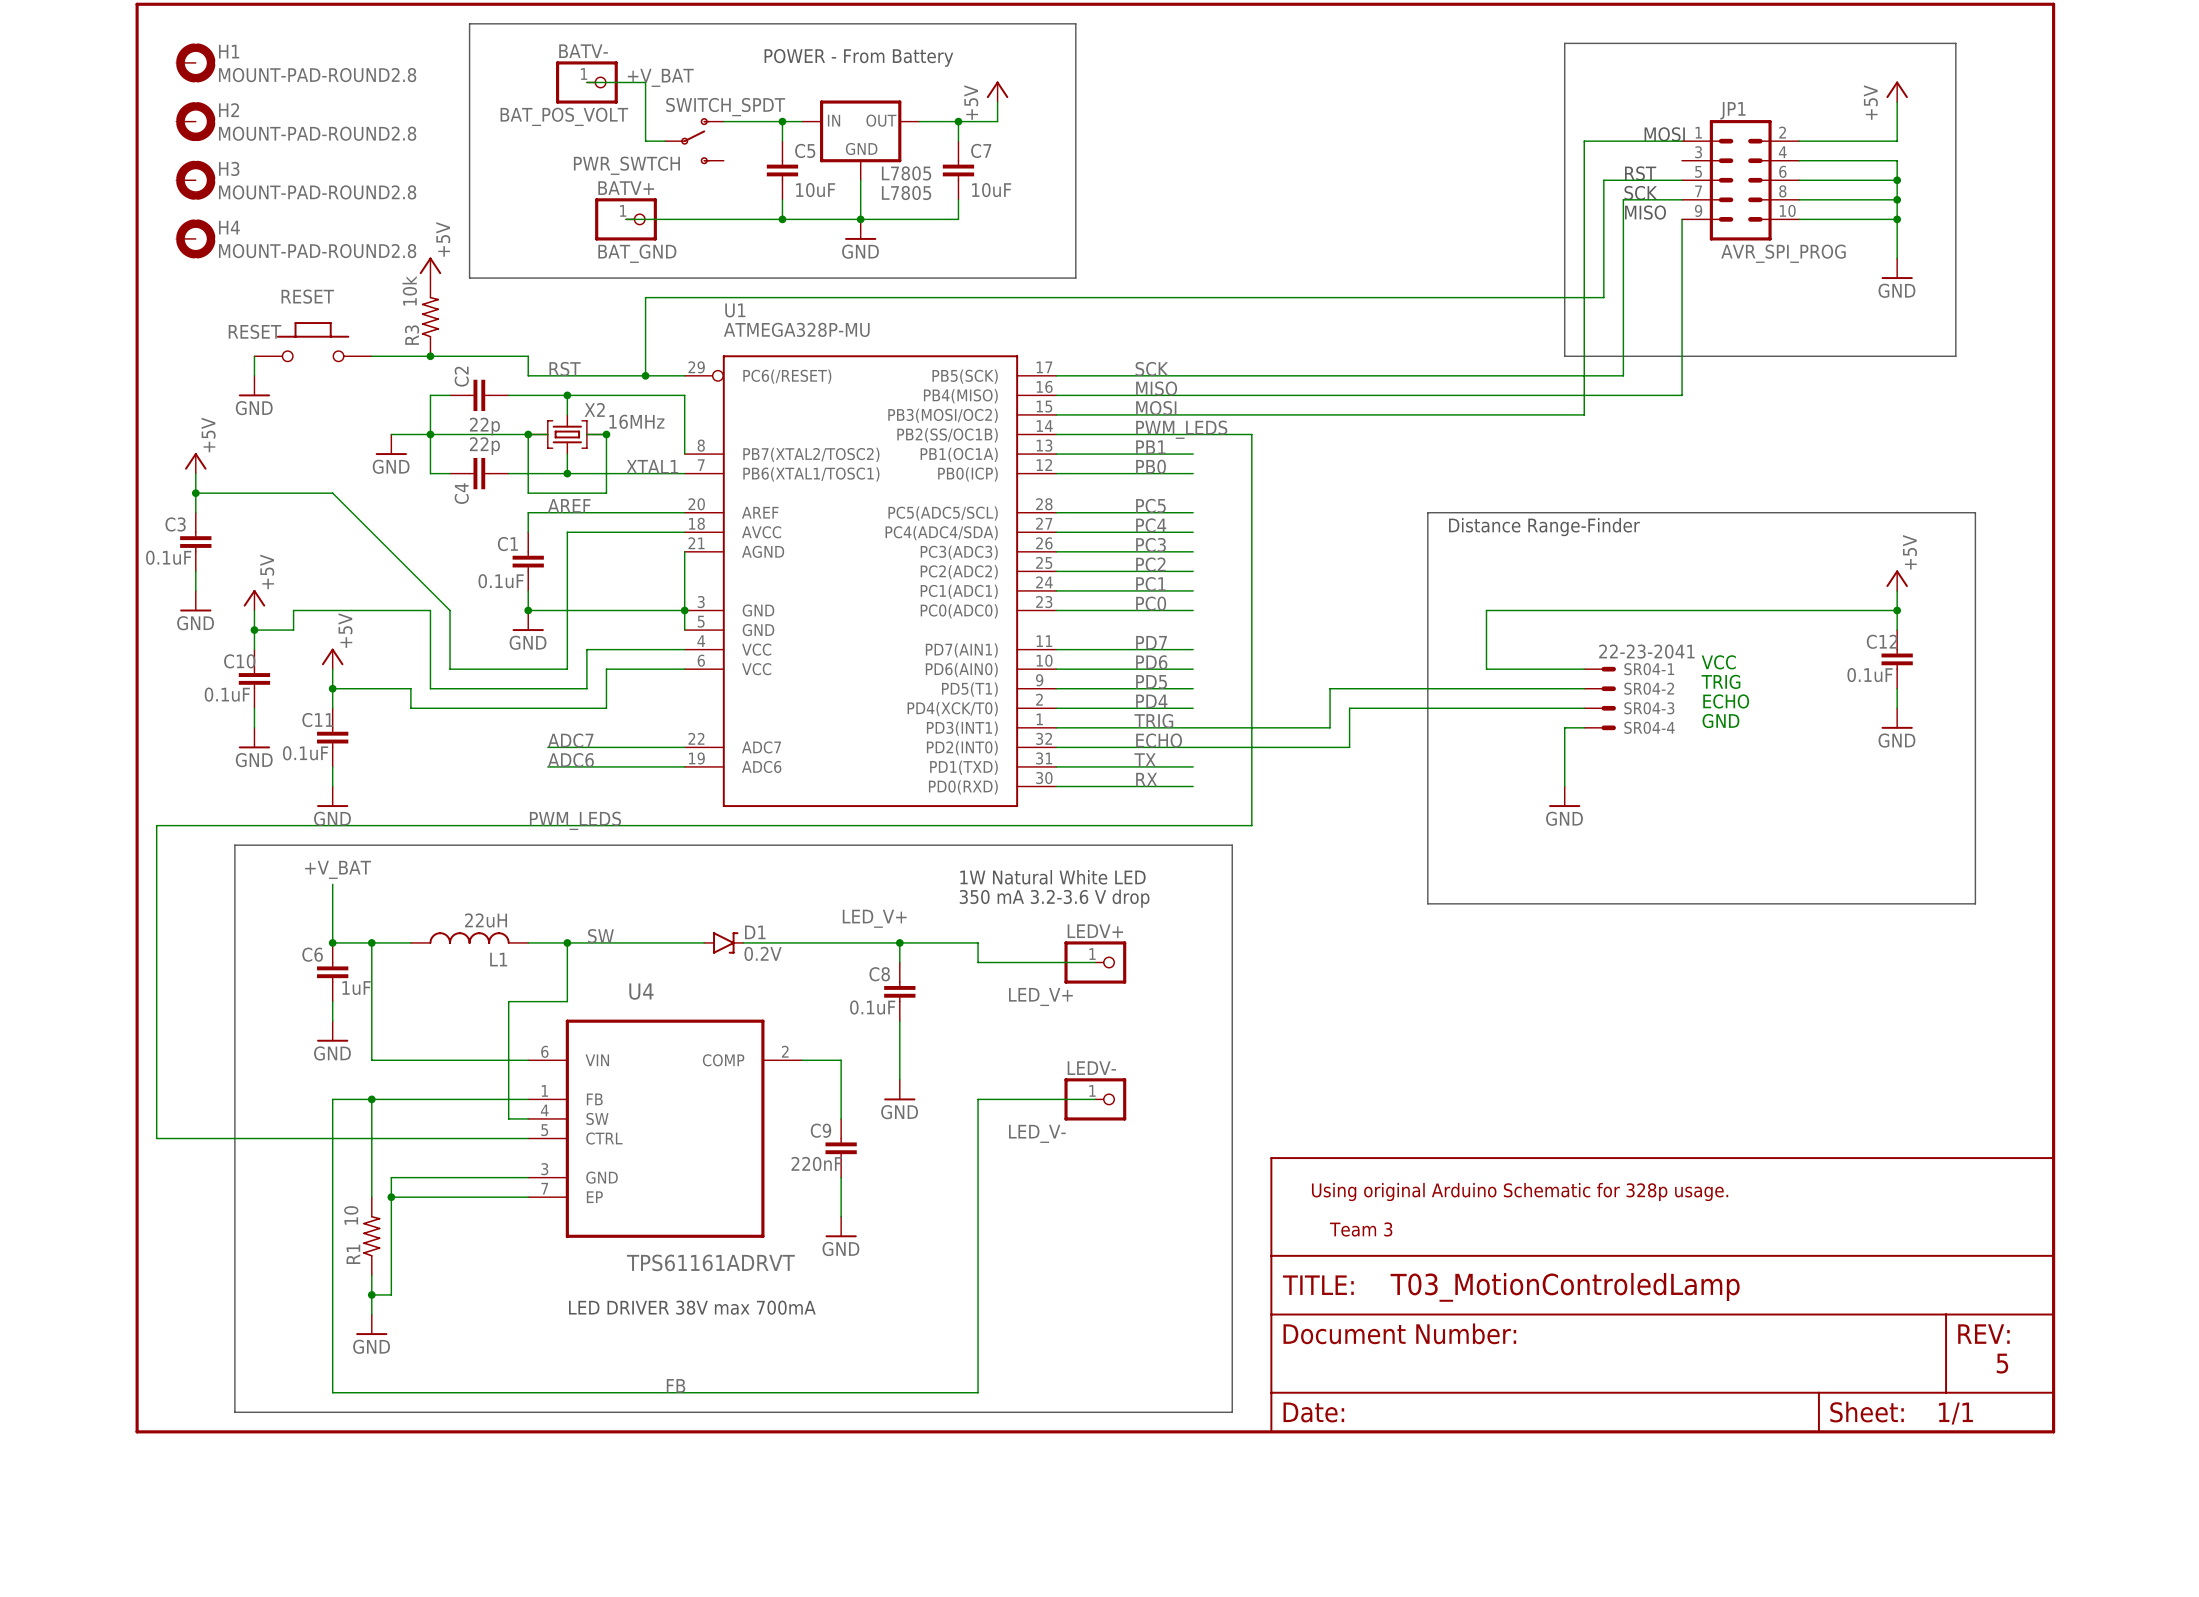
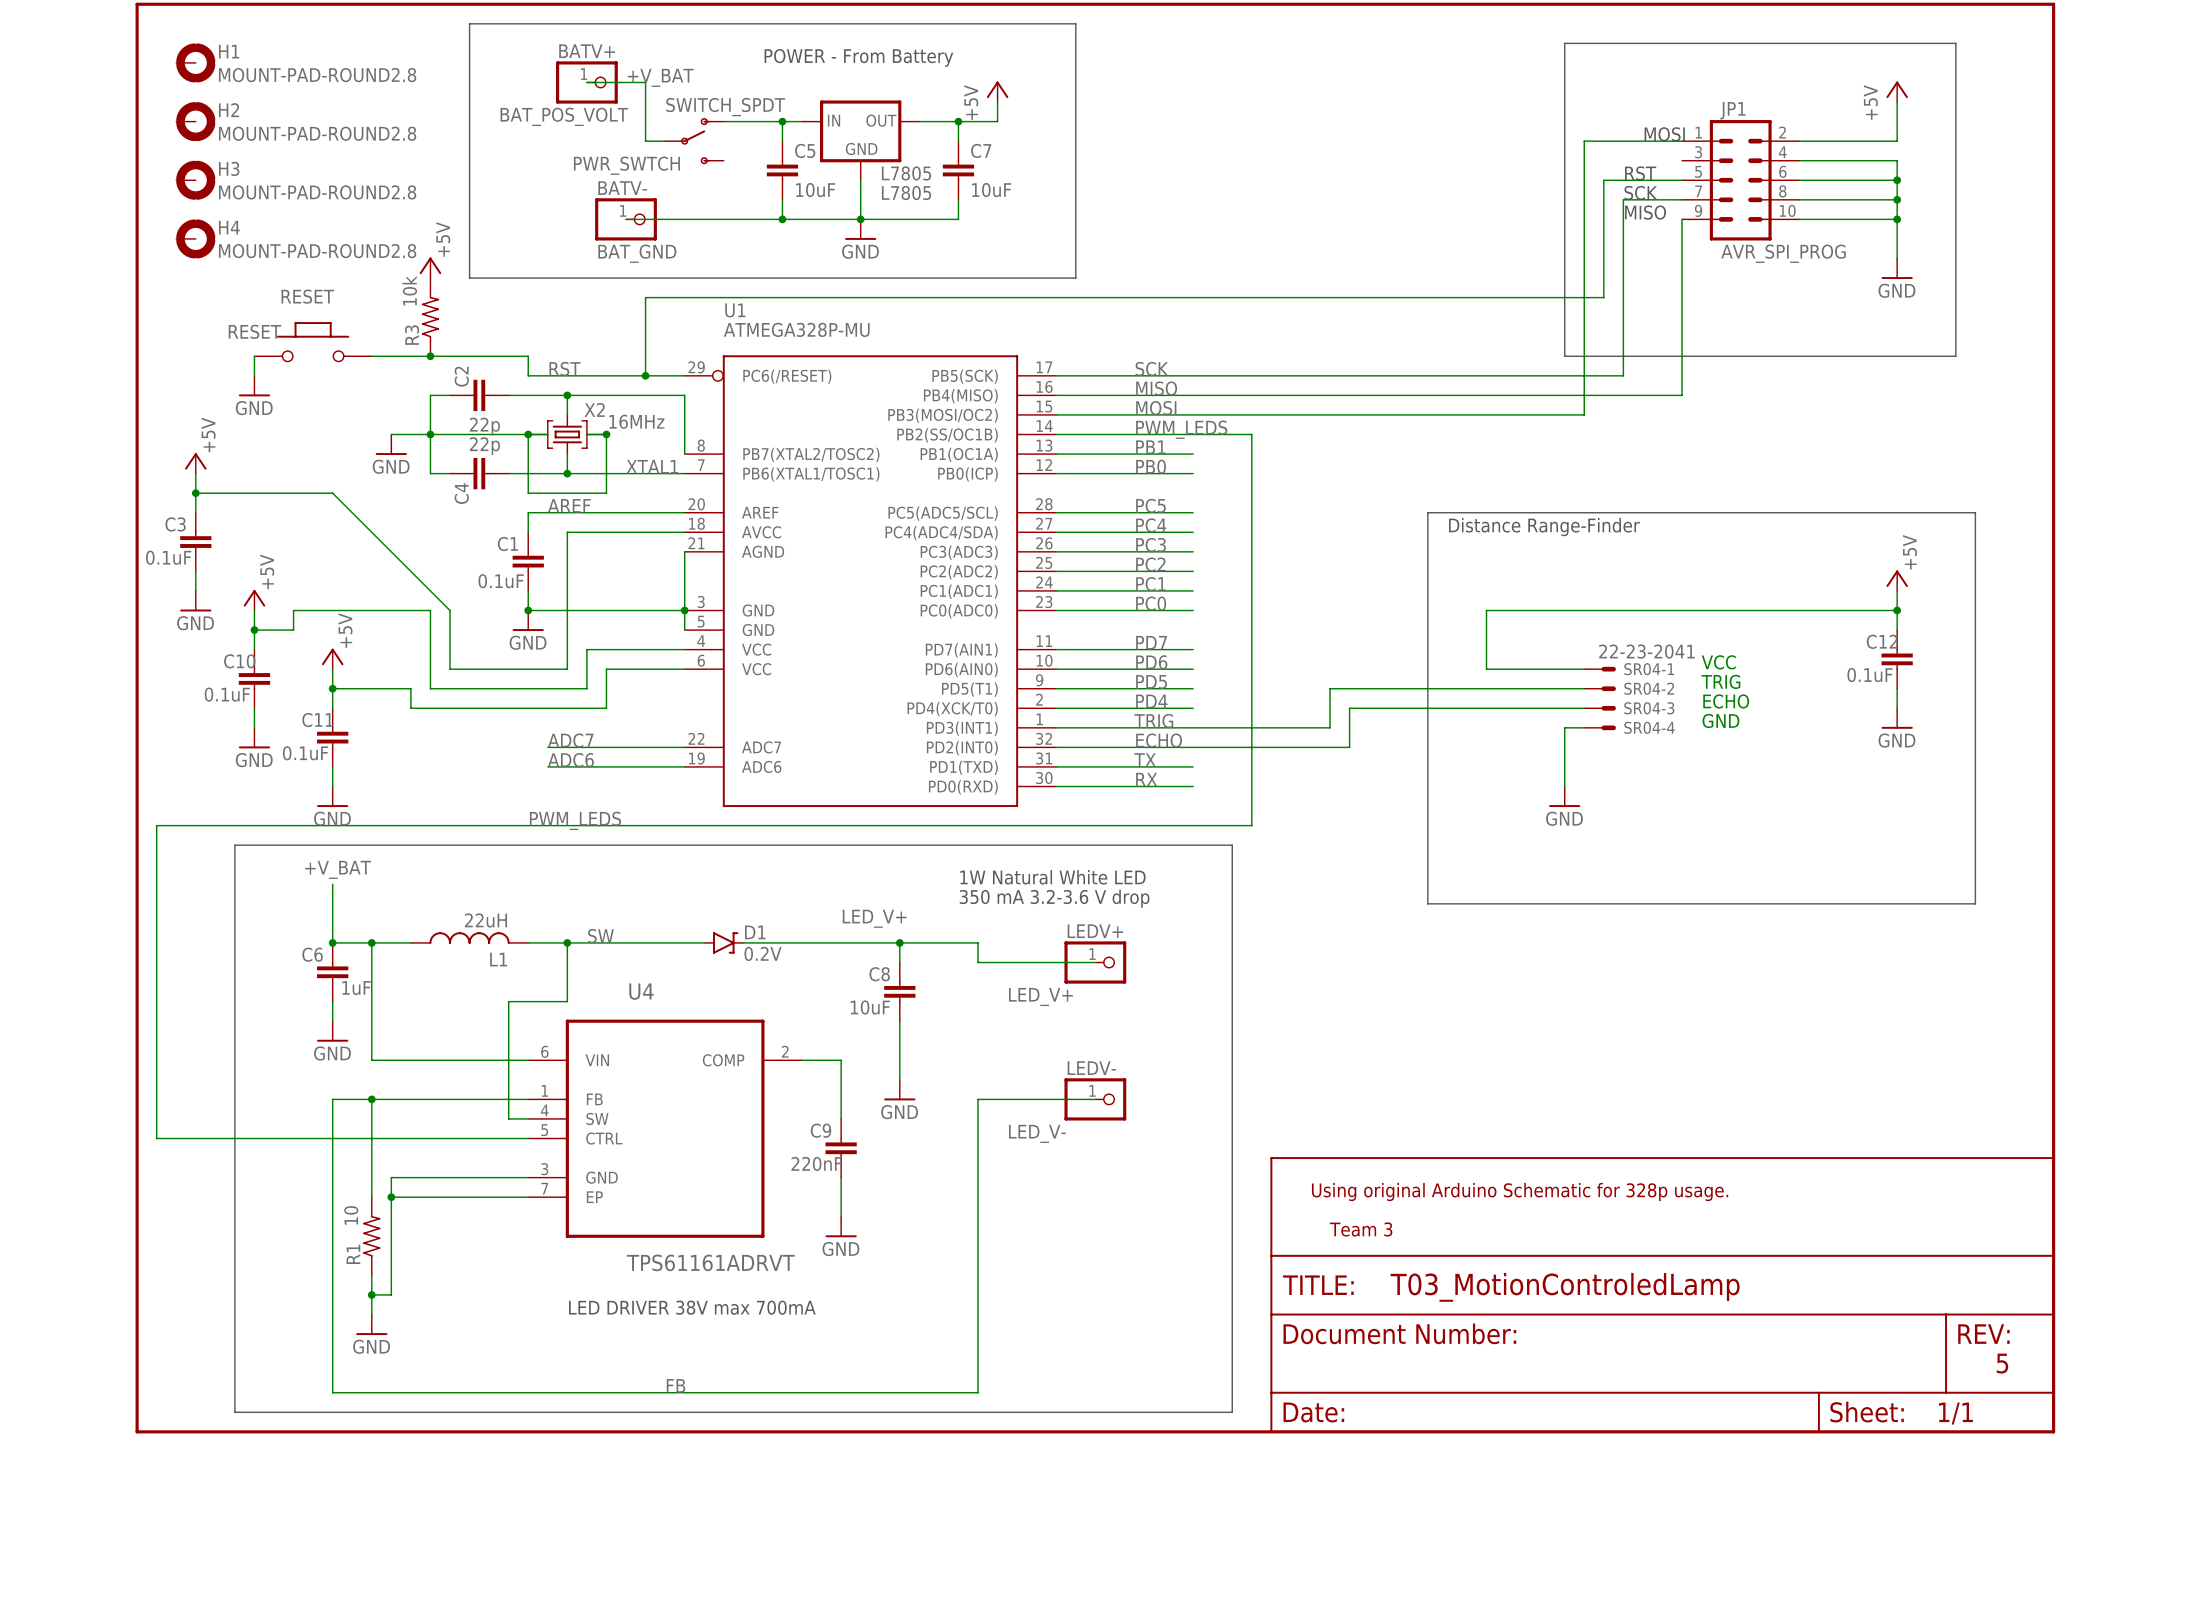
BATV- name: BATV- (583, 51) -> BATV+ (587, 51)
BATV+ name: BATV+ (626, 188) -> BATV- (622, 188)
C8 value: 0.1uF (872, 1007) -> 10uF (870, 1007)

